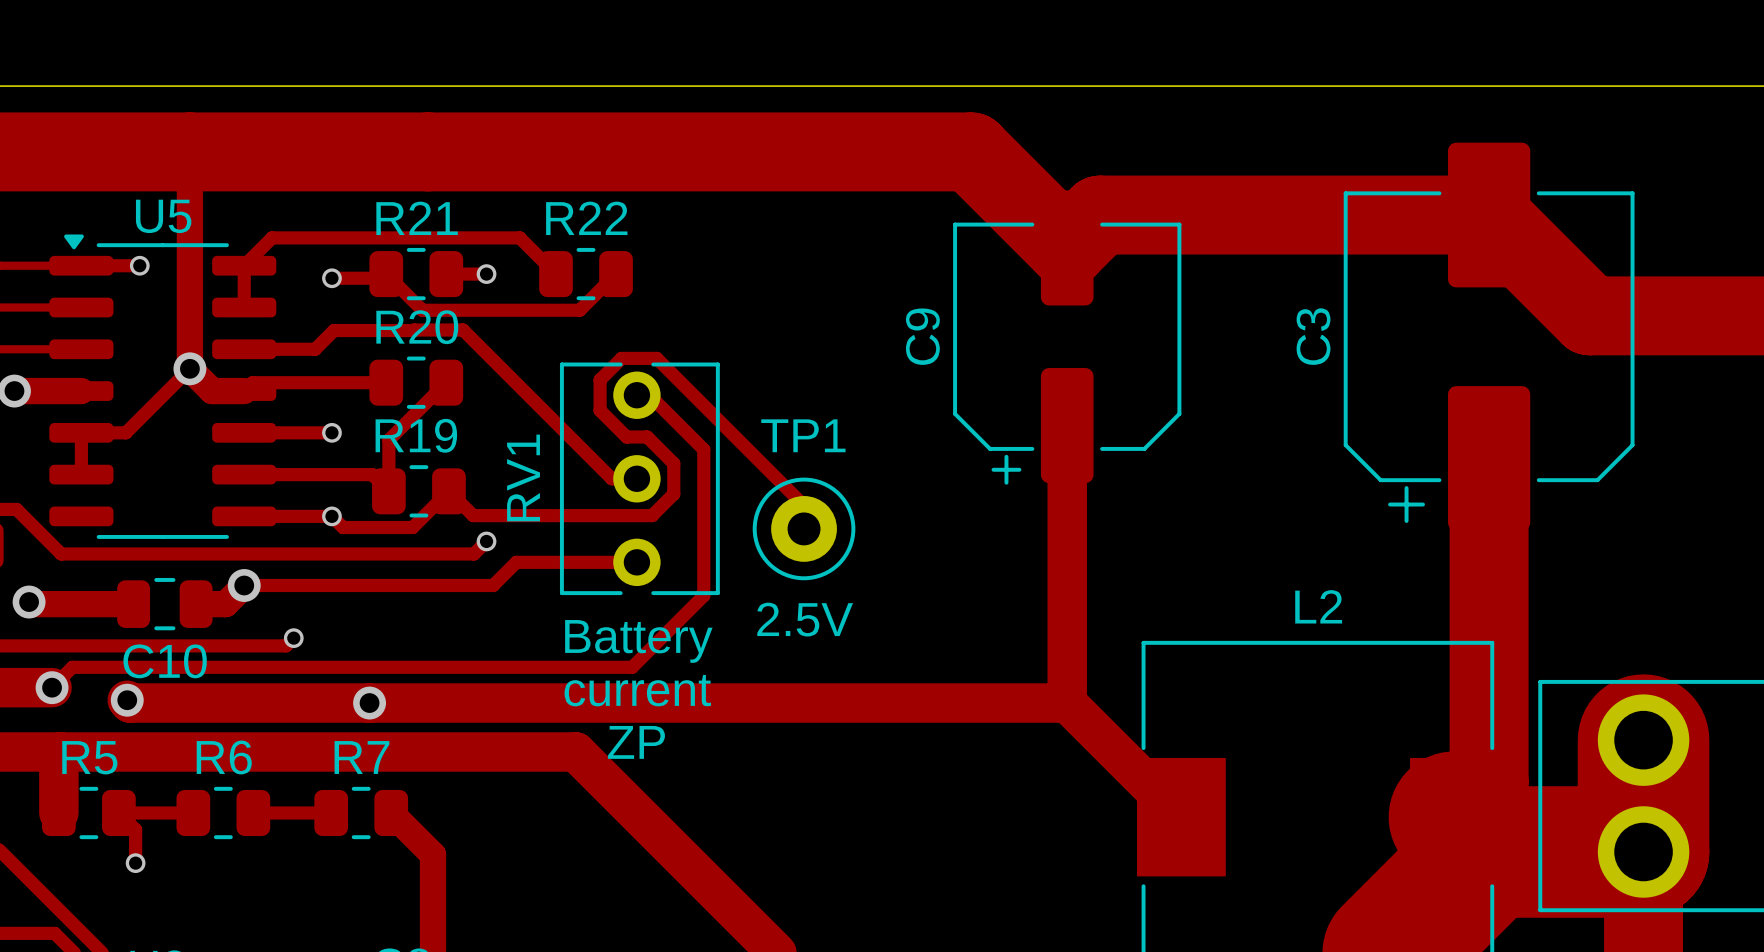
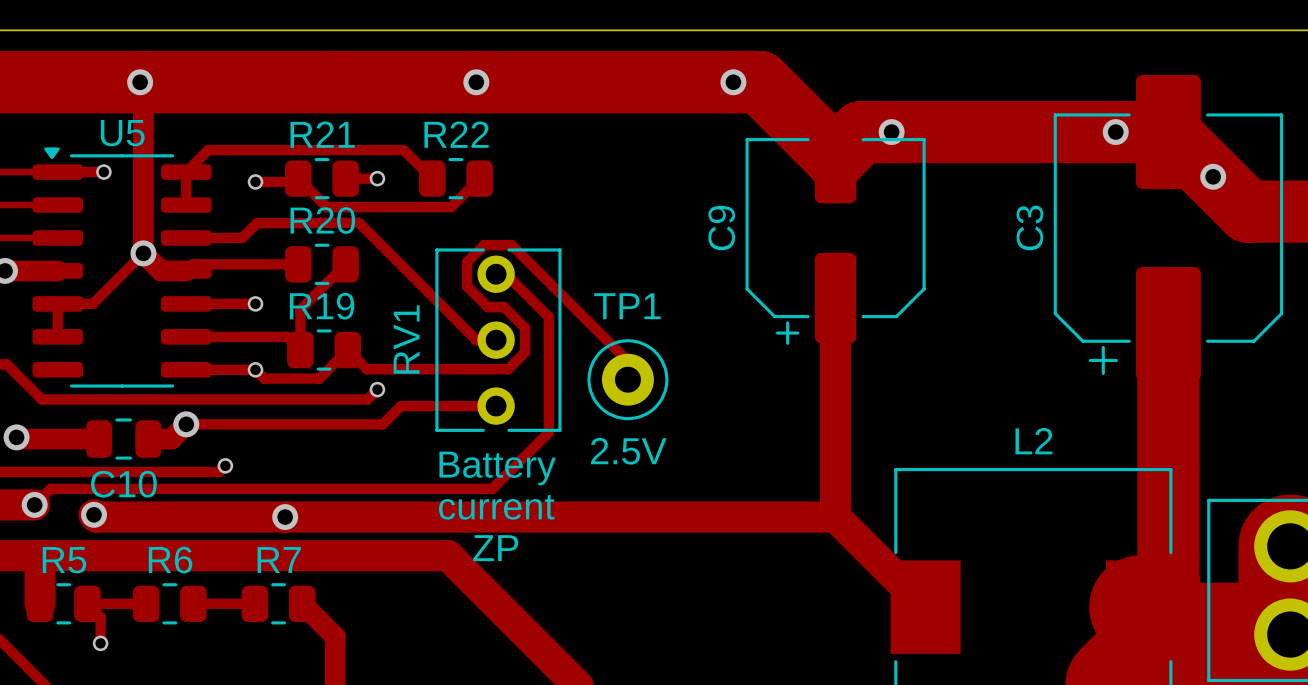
via: none -> (140, 82)
via: none -> (476, 82)
via: none -> (733, 82)
via: none -> (891, 132)
via: none -> (1115, 132)
via: none -> (1213, 176)

